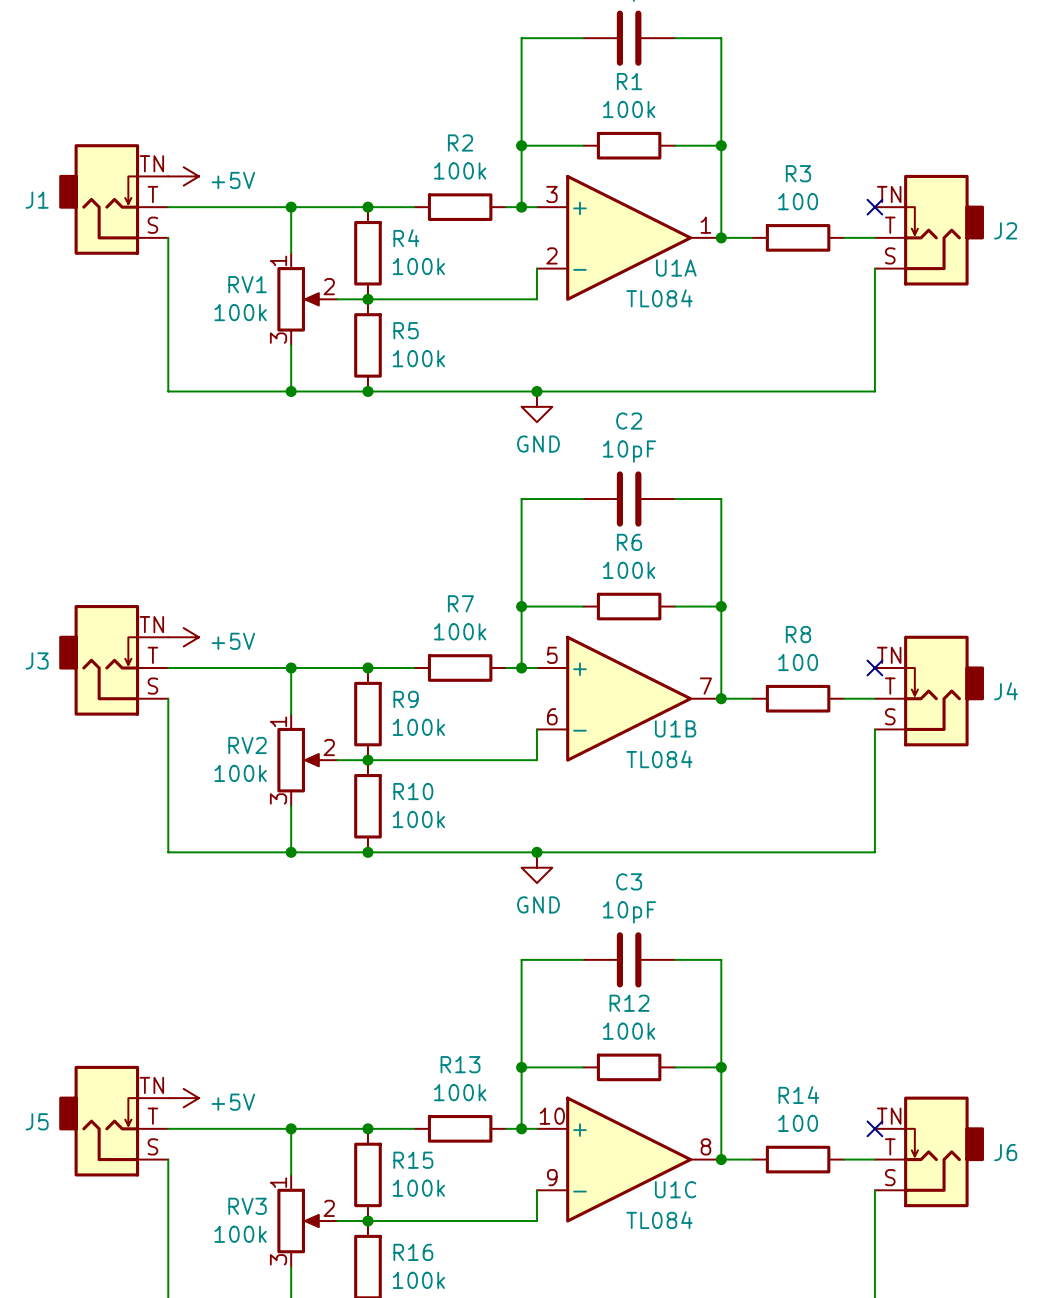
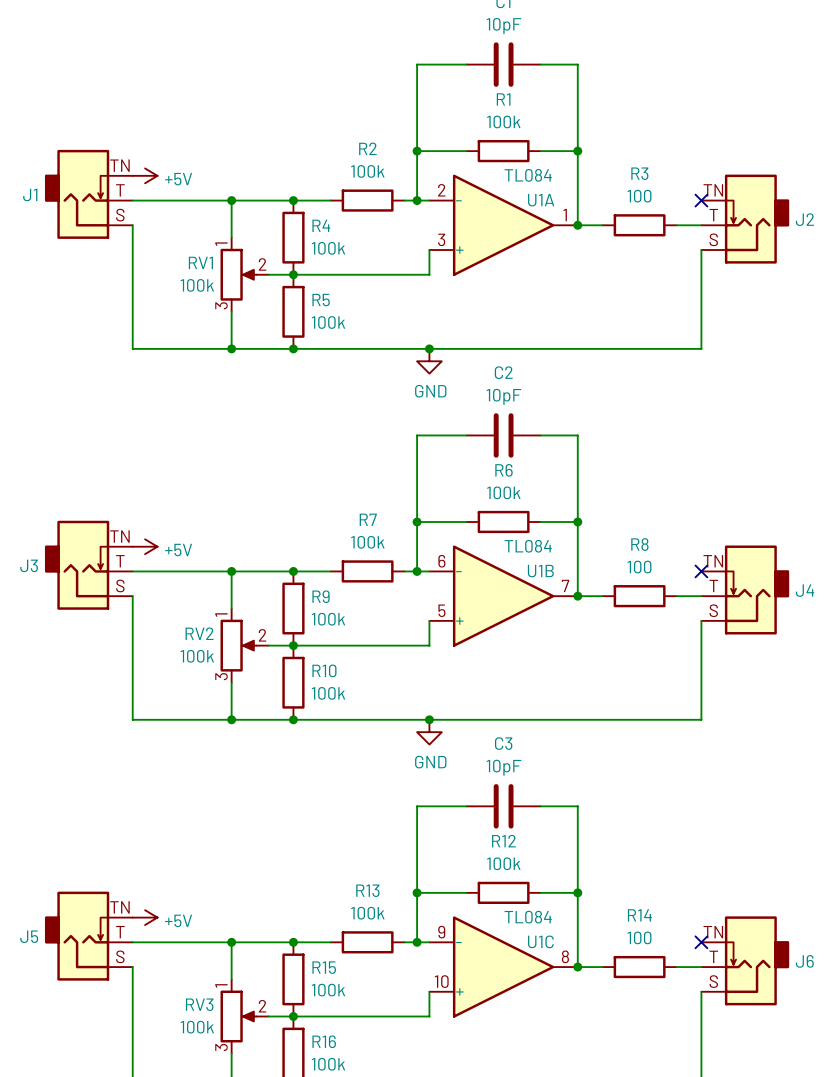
U1A flip: as is (629, 237) -> up-down (503, 225)
U1B flip: as is (629, 698) -> up-down (503, 596)
U1C flip: as is (629, 1159) -> up-down (503, 967)

